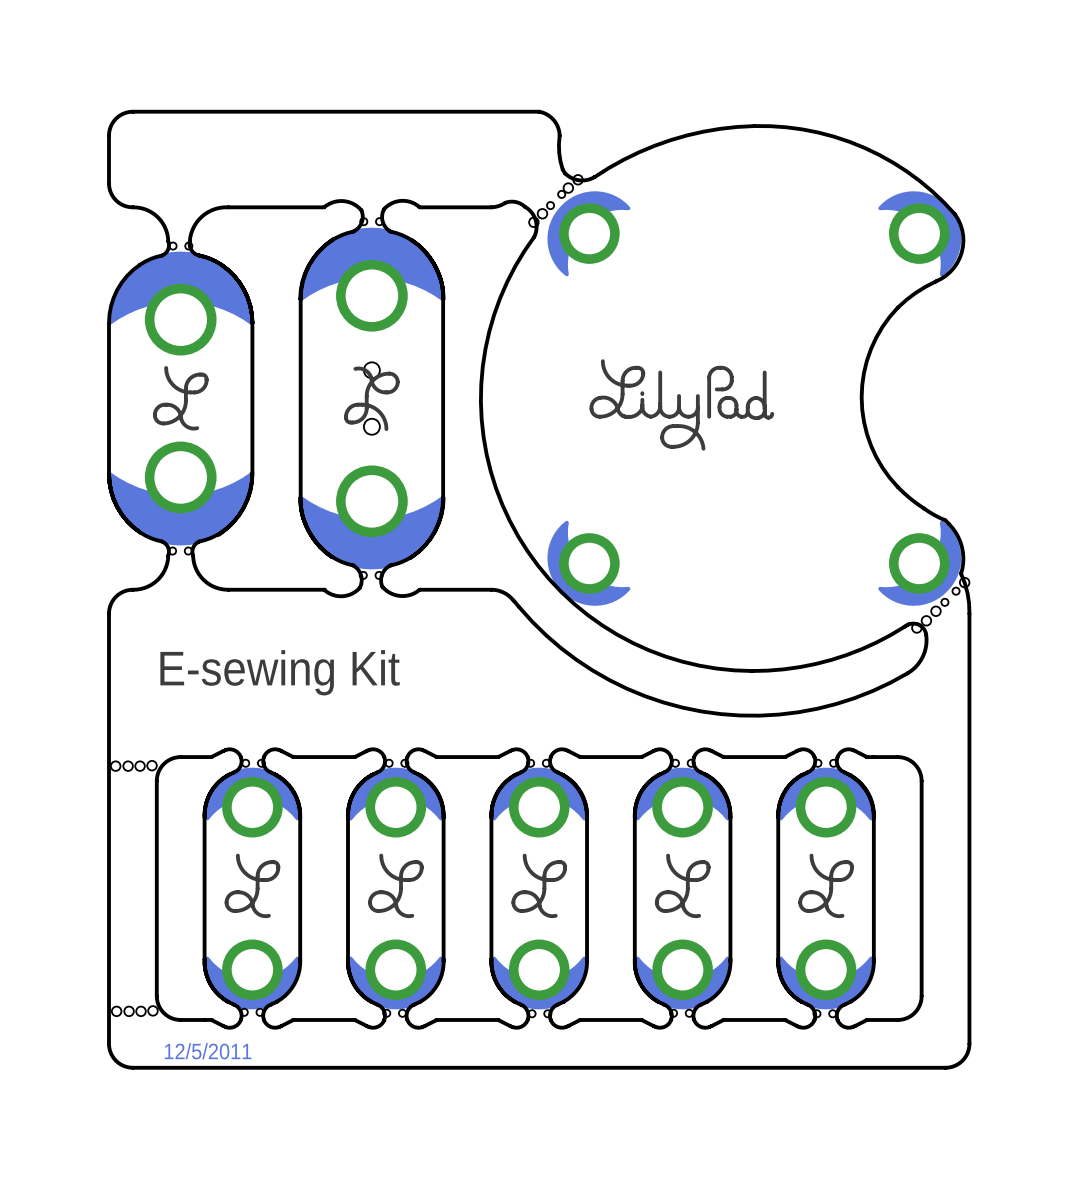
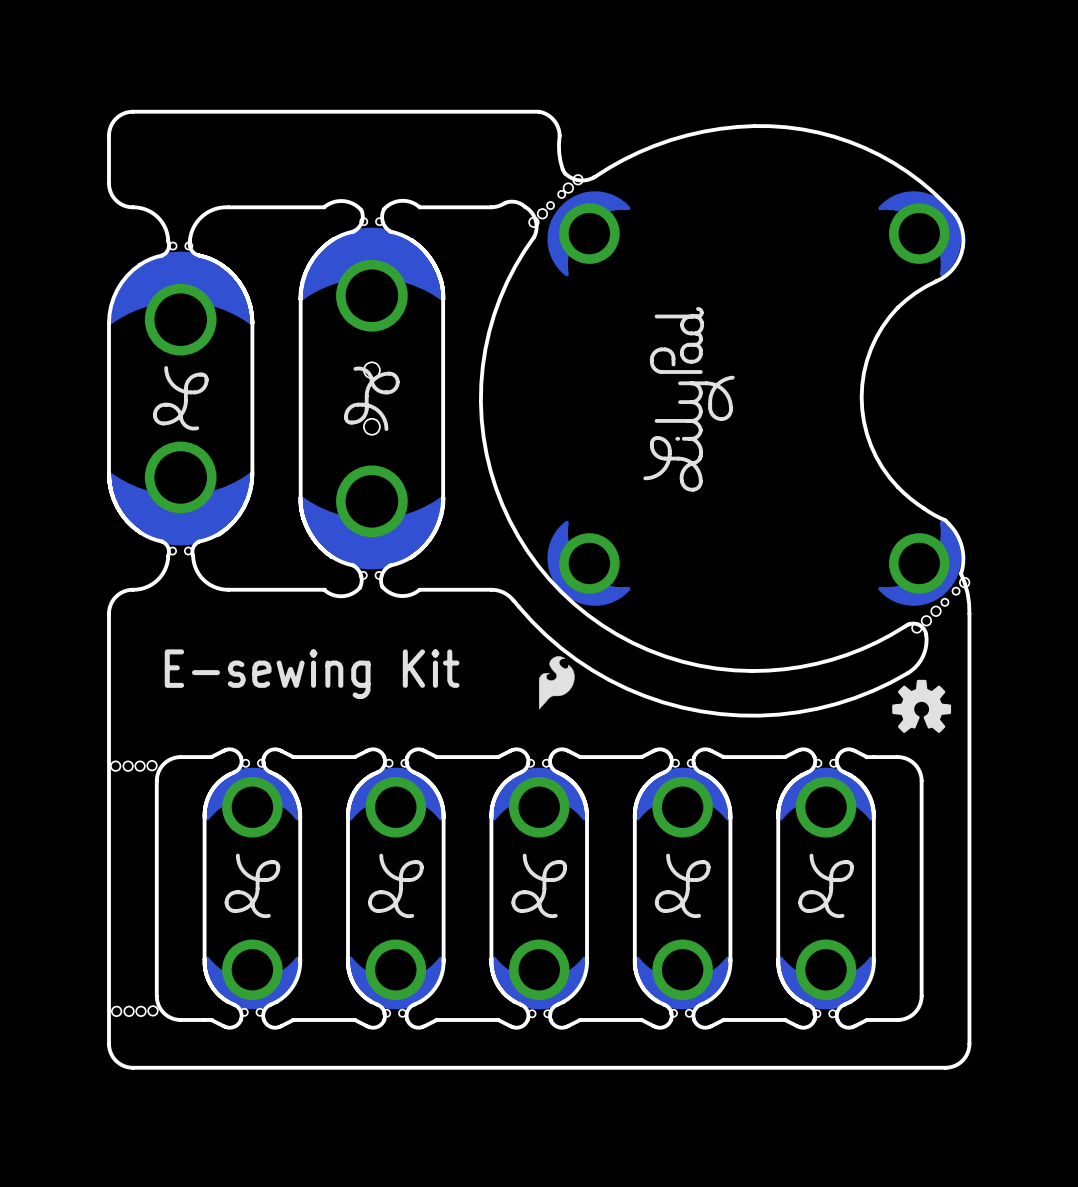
drawing shape: [589, 359, 775, 451] -> [643, 307, 735, 492]
drawing: none -> [538, 656, 575, 710]
drawing: none -> [892, 679, 952, 733]
text: 12/5/2011 (208, 1051) -> none

